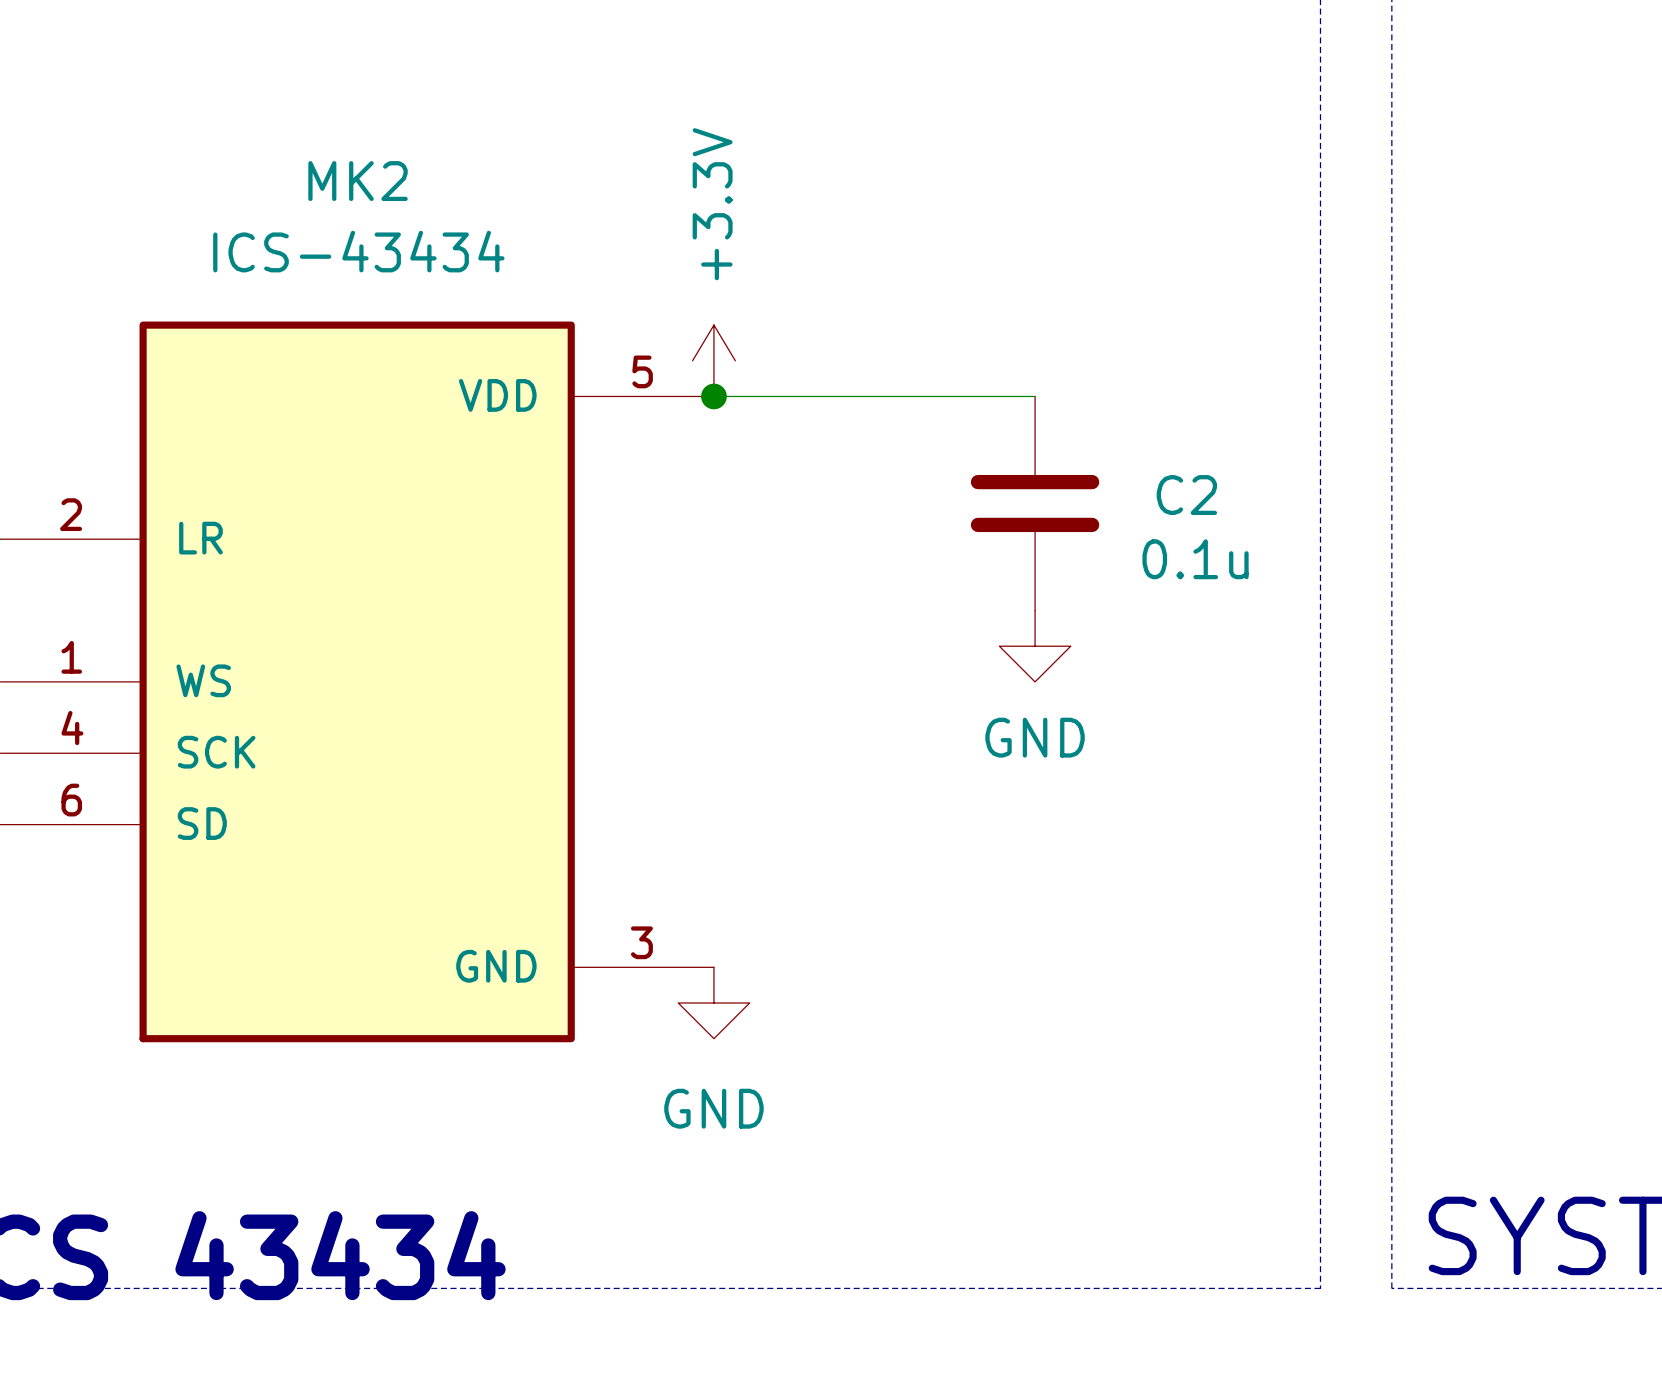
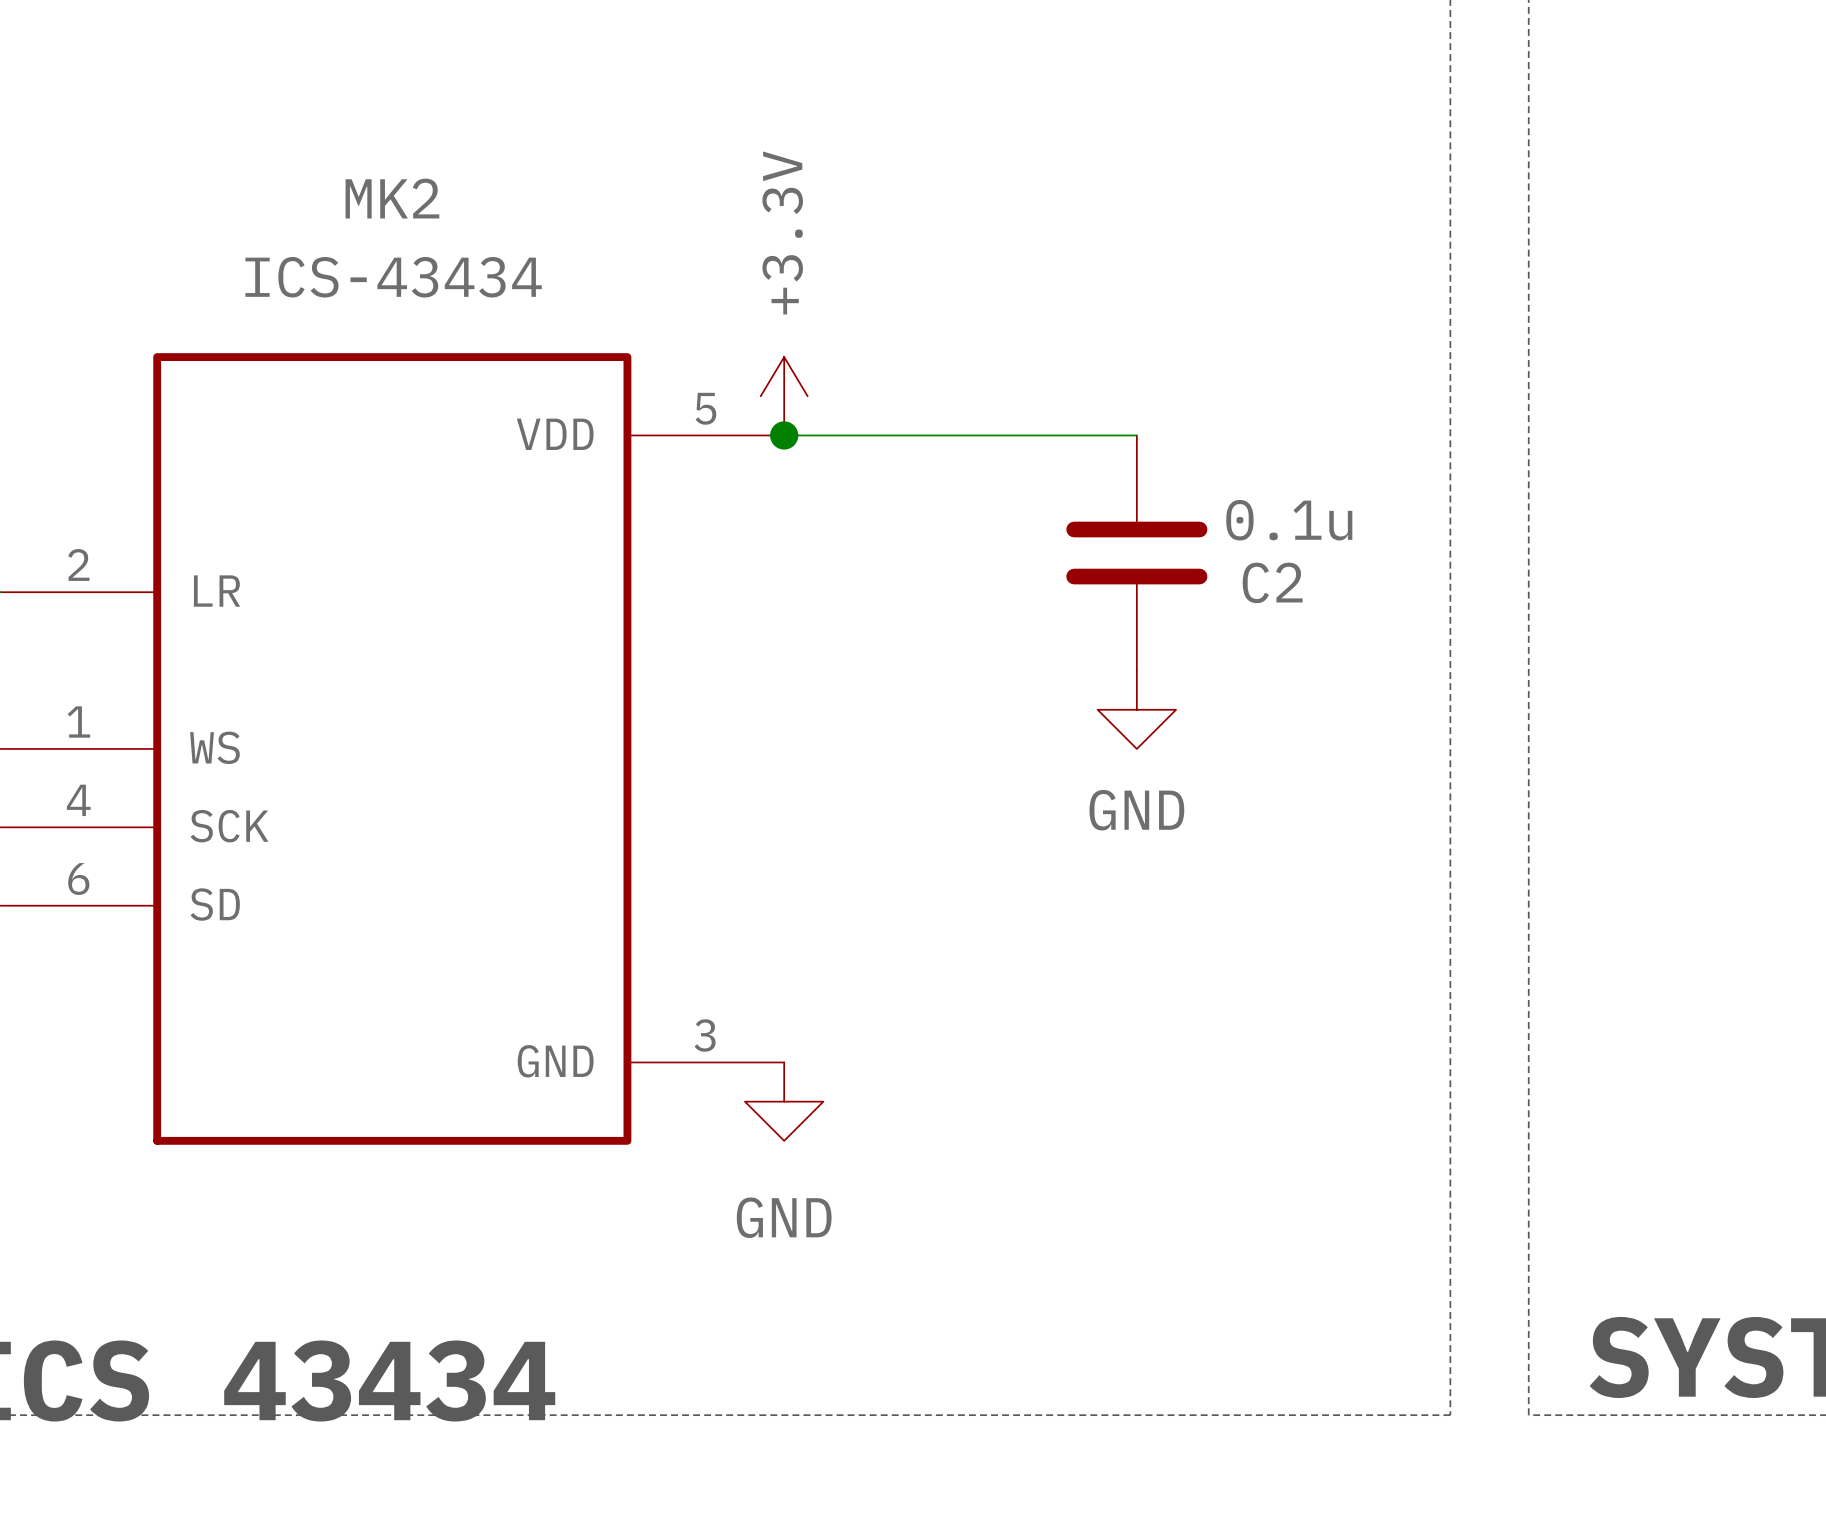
C2 name position: C2 (1186, 495) -> C2 (1272, 582)
C2 value position: 0.1u (1195, 559) -> 0.1u (1289, 520)

